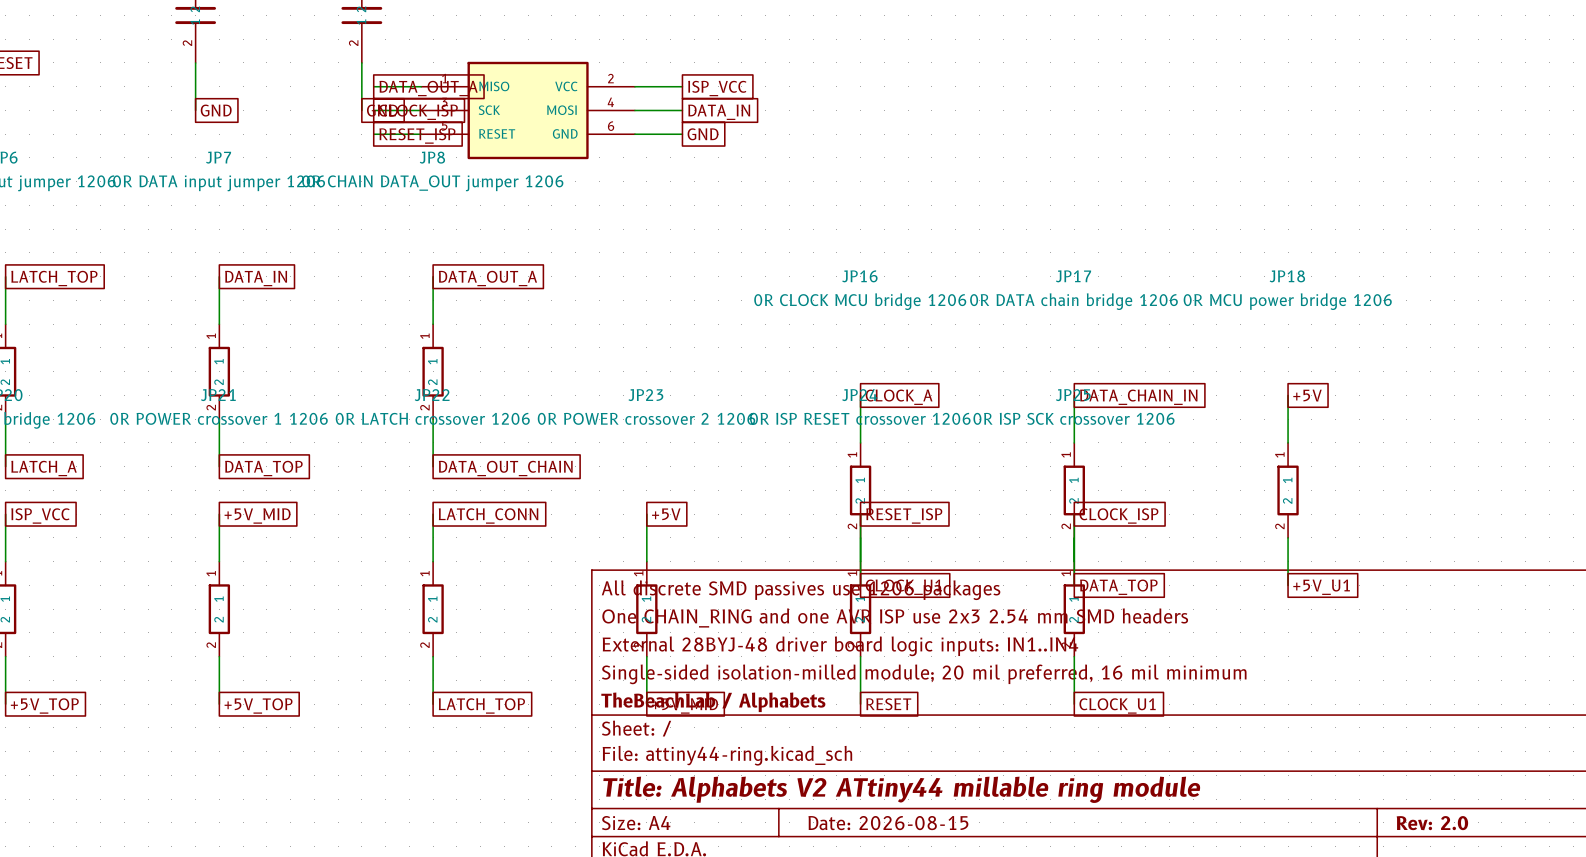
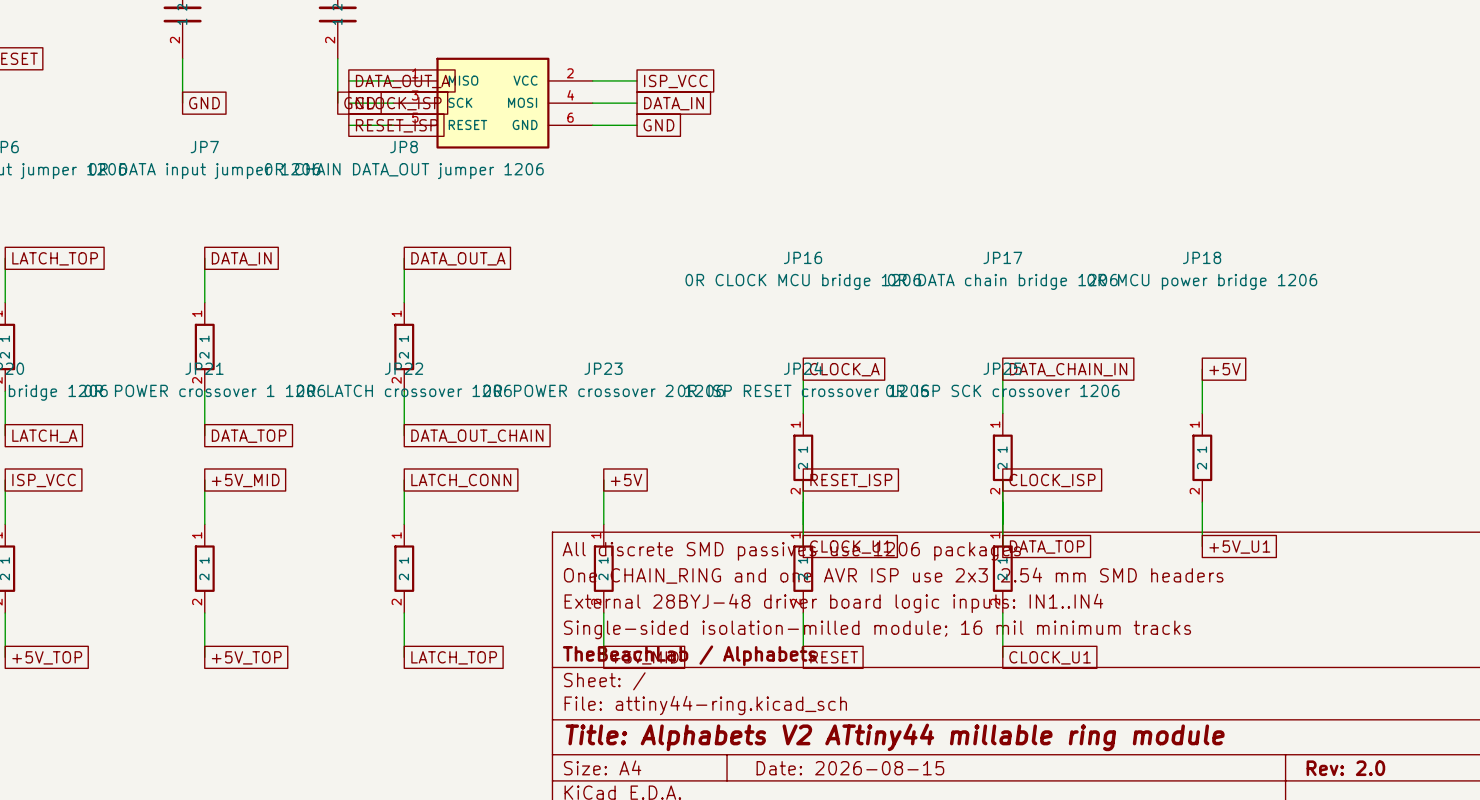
title block: Single-sided isolation-milled module; 20 mil preferred, 16 mil minimum (924, 674) -> Single-sided isolation-milled module; 16 mil minimum tracks (877, 629)

